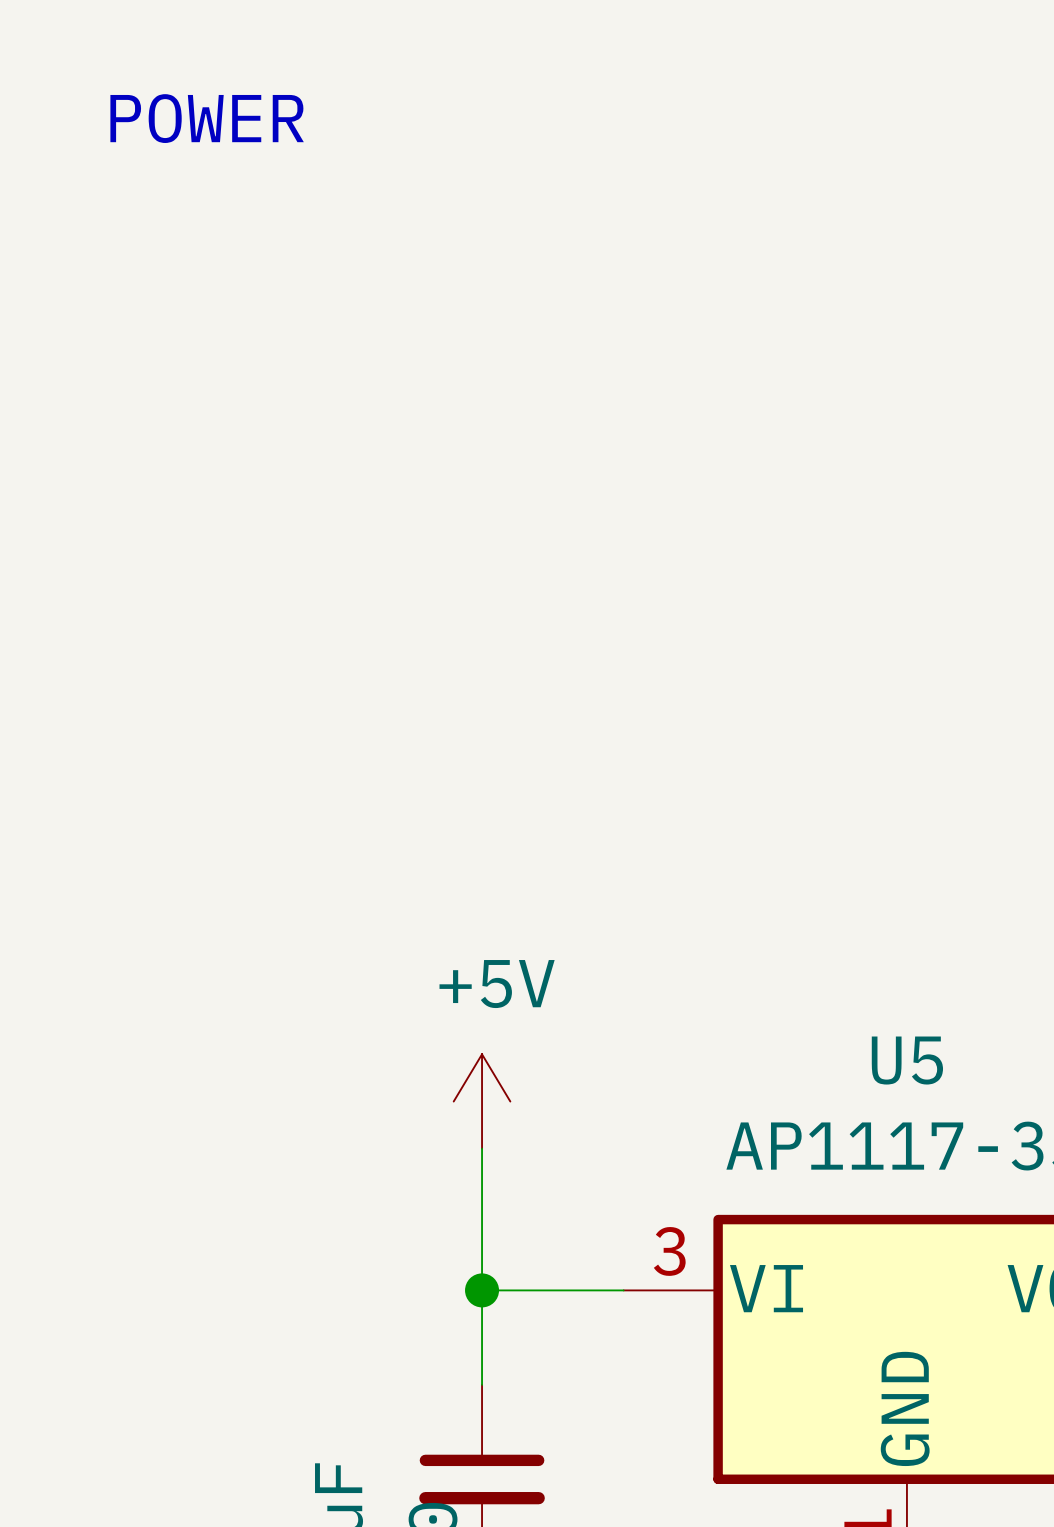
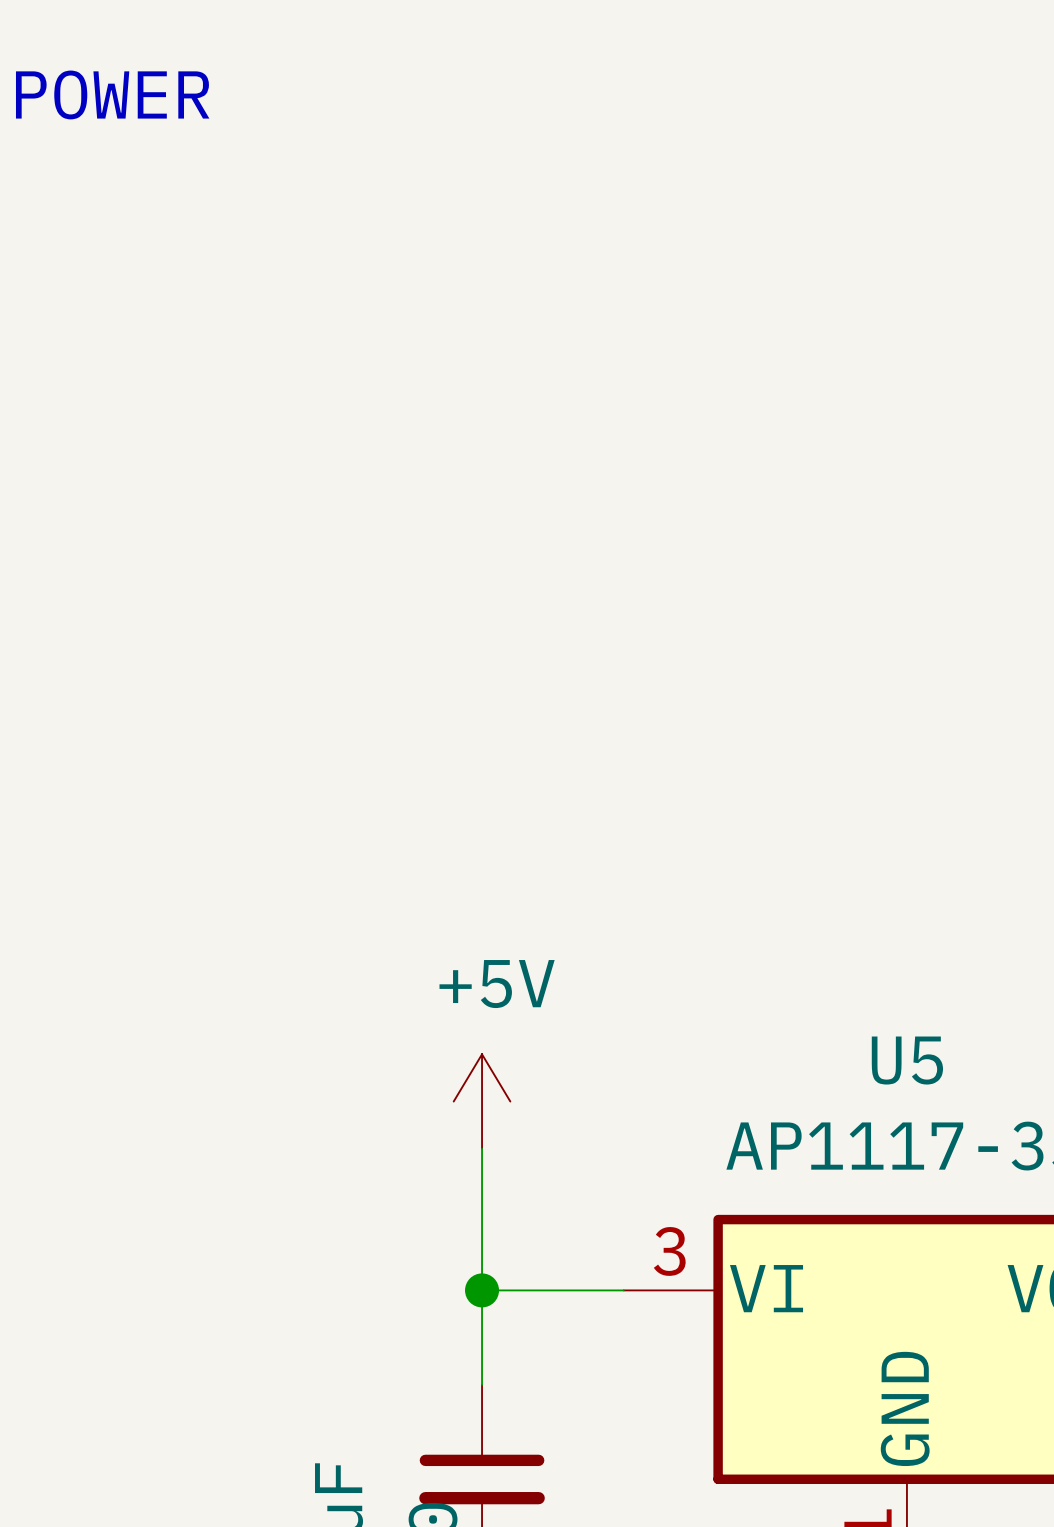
text position: POWER (207, 118) -> POWER (112, 94)

